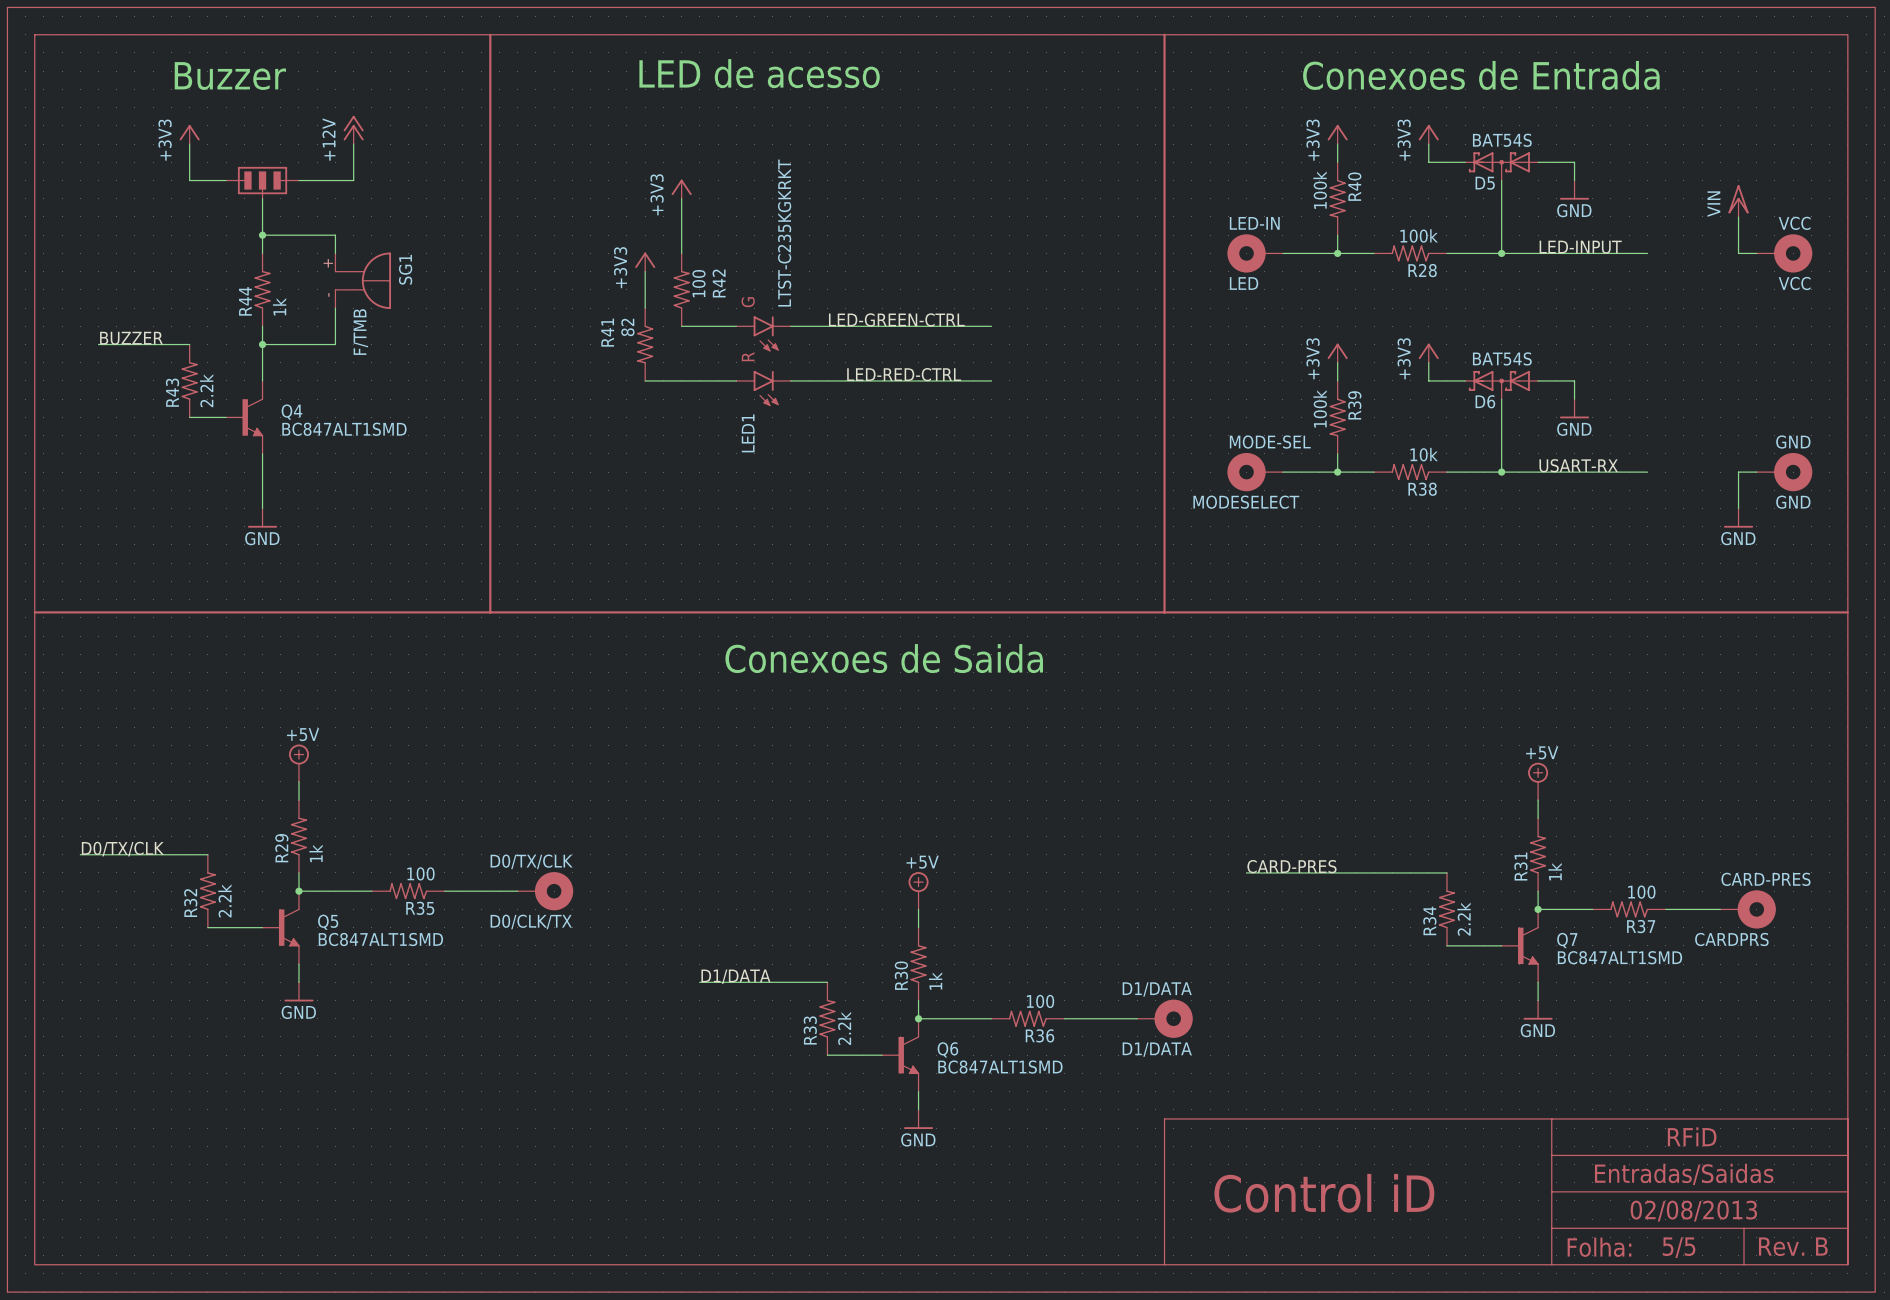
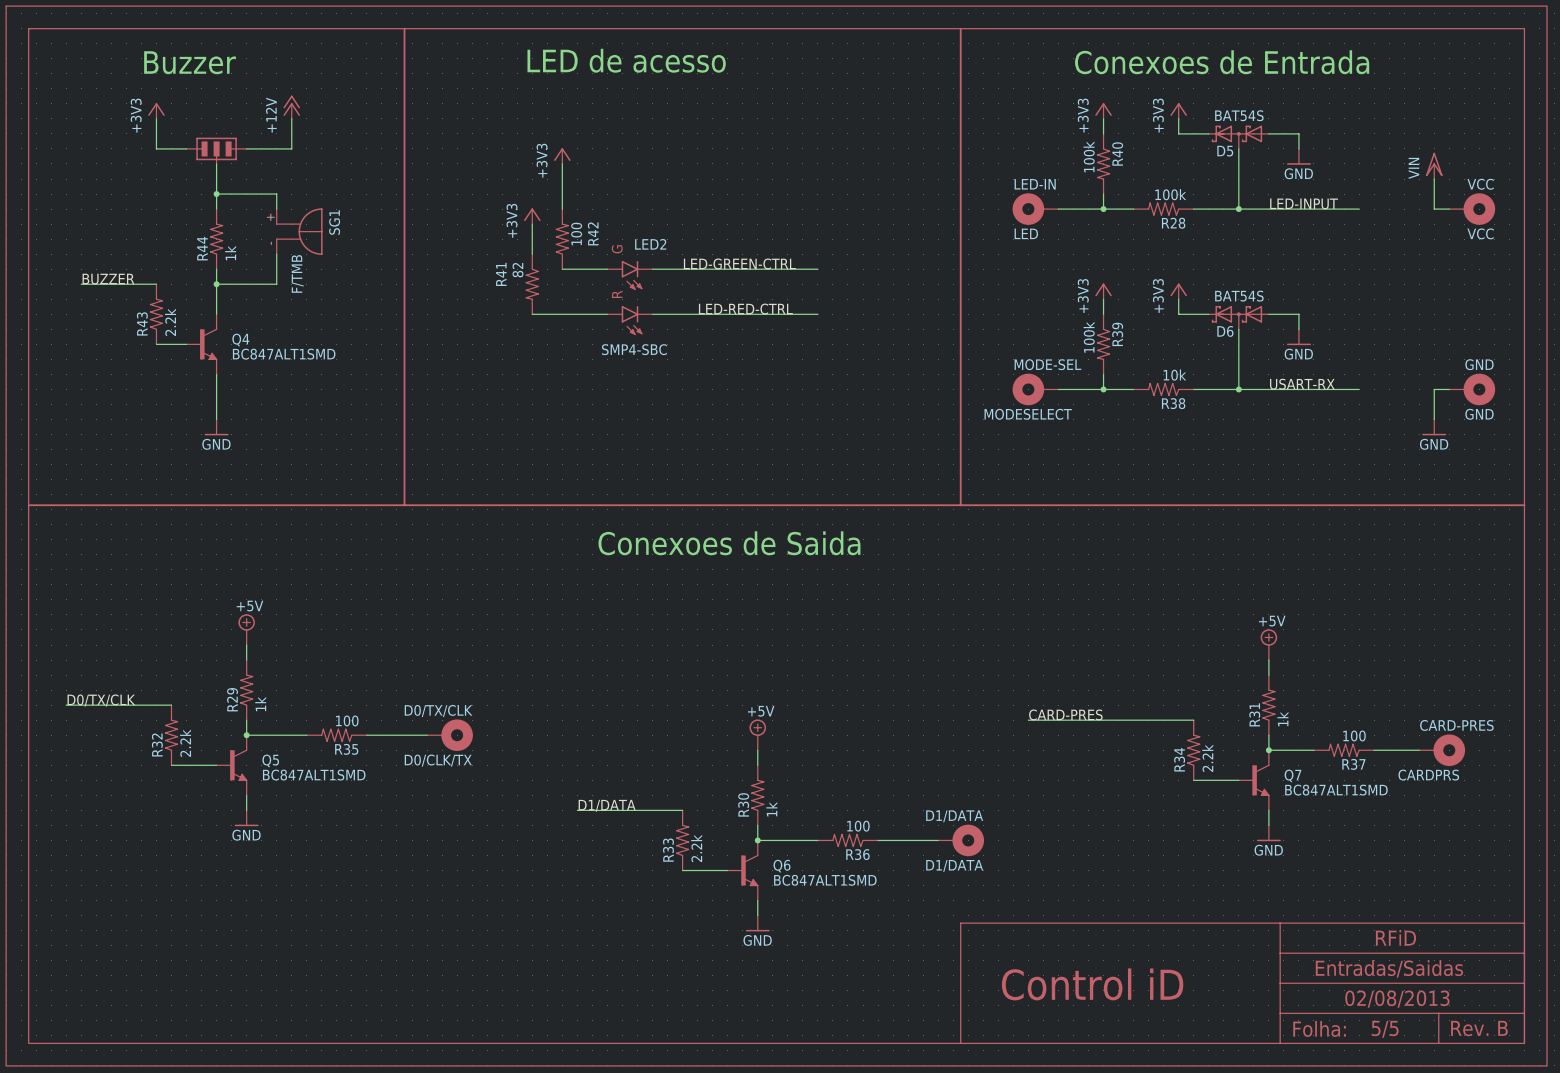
LED1 value: LTST-C235KGKRKT (784, 233) -> SMP4-SBC (634, 349)
LED1 name: LED1 (748, 433) -> LED2 (650, 244)

